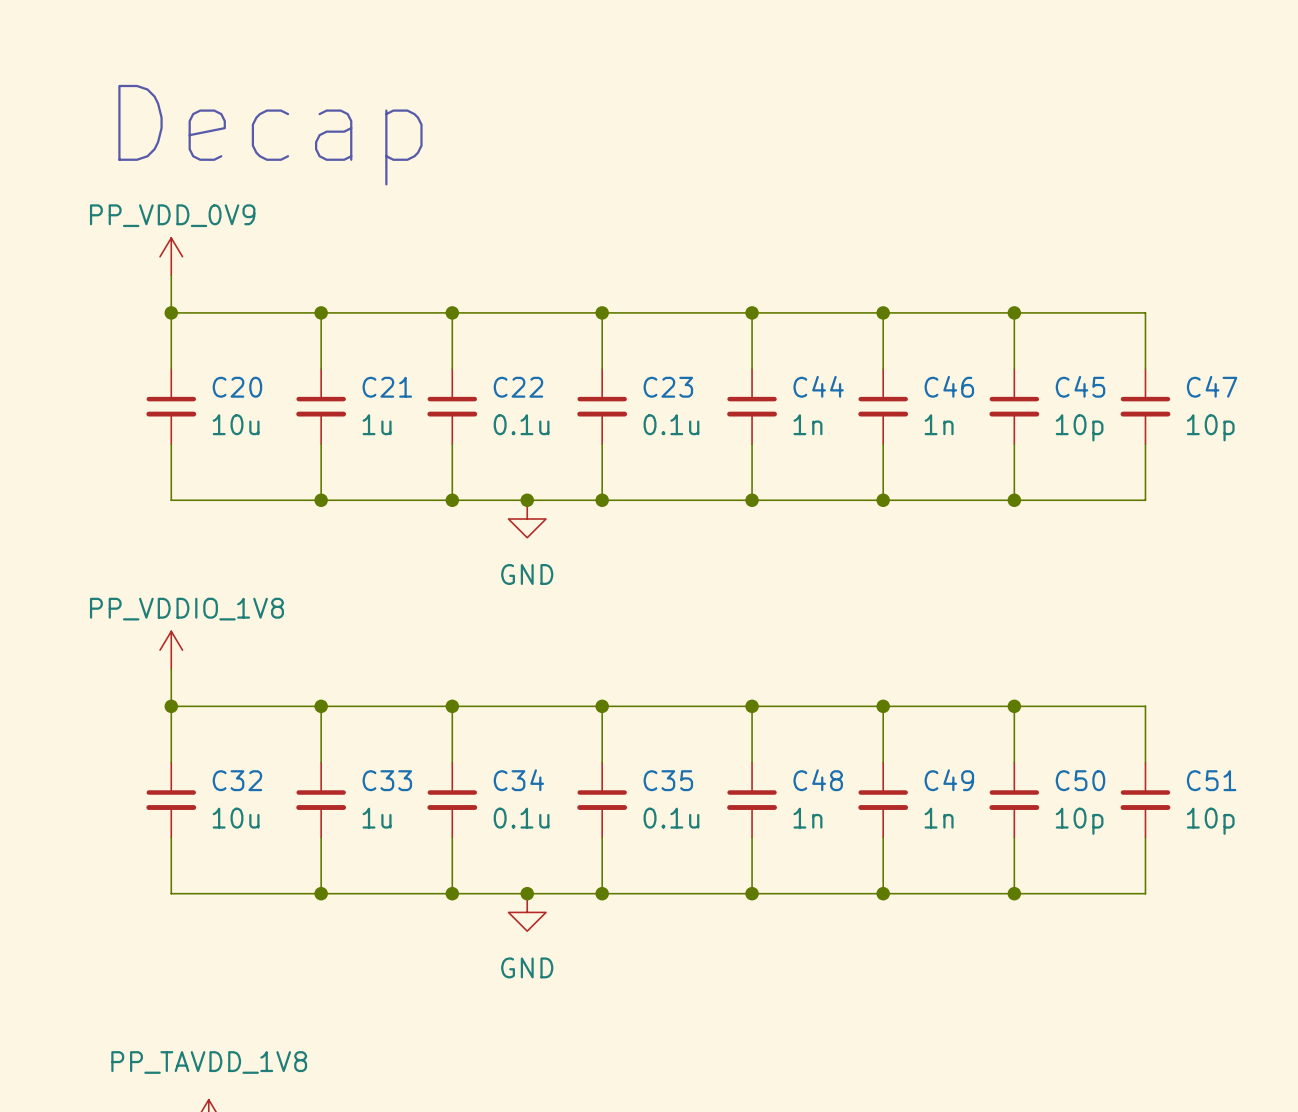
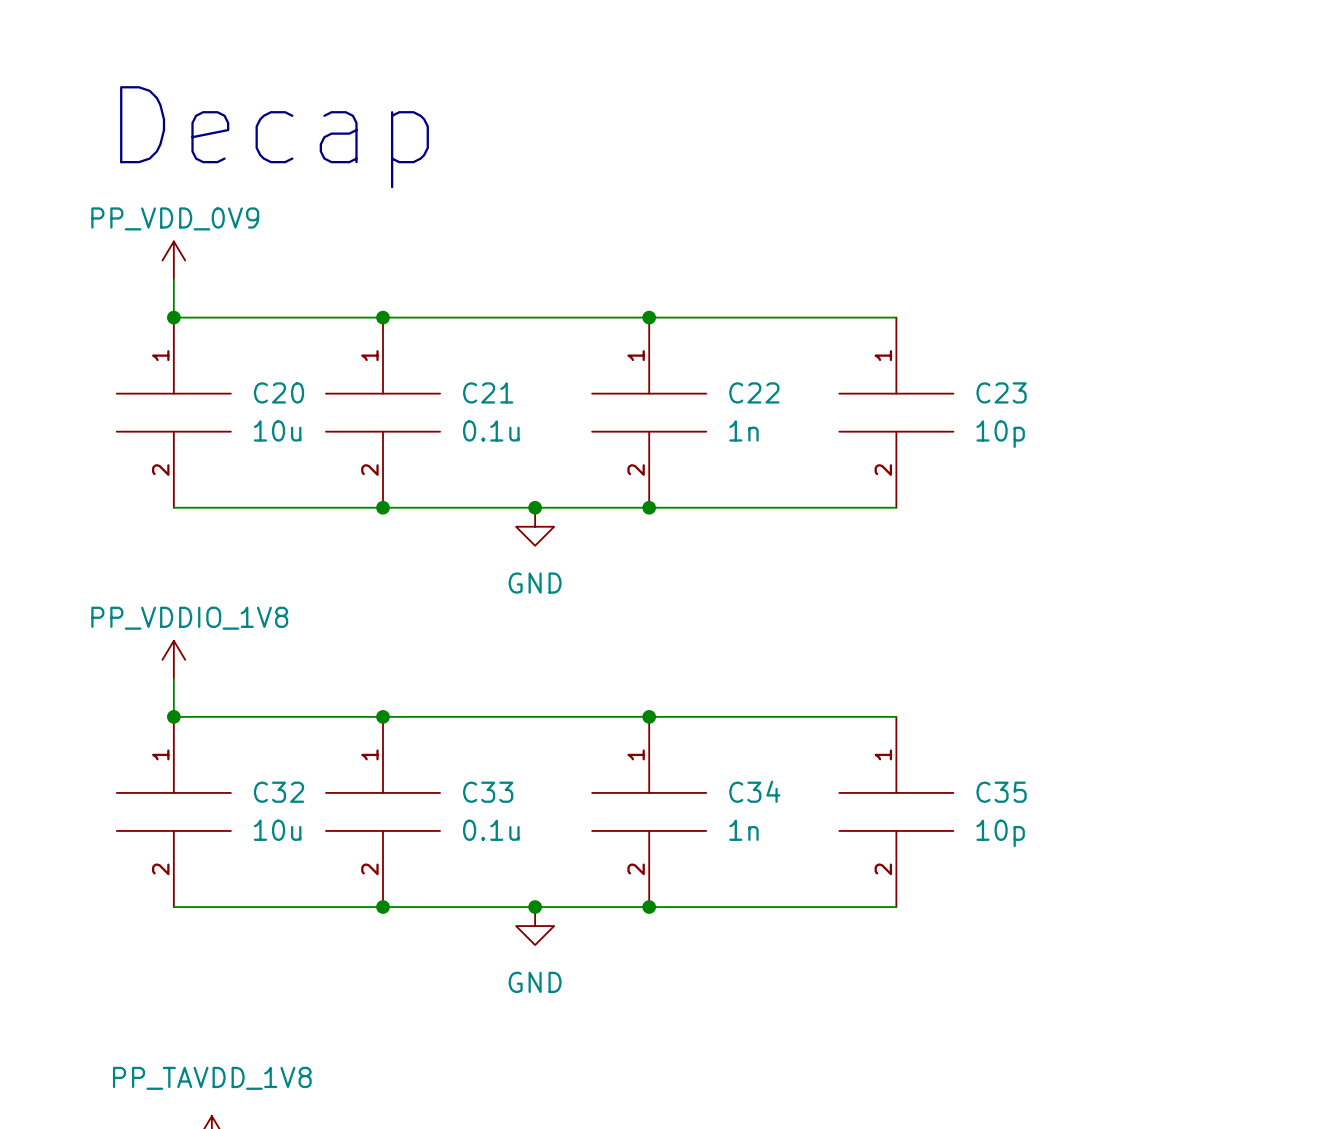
wire: (321, 312) (321, 369) -> none
junction: (321, 312) -> none
junction: none -> (383, 317)
wire: (452, 312) (452, 369) -> none
junction: (452, 312) -> none
wire: (602, 312) (602, 369) -> none
junction position: (602, 312) -> (649, 317)
wire: (752, 312) (752, 369) -> none
junction: (752, 312) -> none
junction: (883, 312) -> none
wire: (1014, 312) (1014, 369) -> none
junction: (1014, 312) -> none
C20 symbol: [146, 369, 197, 445] -> [116, 317, 231, 508]
C21 symbol: [296, 369, 347, 445] -> [325, 317, 441, 508]
C22 symbol: [427, 369, 478, 445] -> [592, 317, 707, 508]
C23 symbol: [577, 369, 628, 445] -> [839, 317, 954, 508]
wire: (883, 369) (883, 312) (1145, 312) (1145, 369) -> none
C20 name position: C20 (237, 387) -> C20 (279, 392)
C21 name position: C21 (387, 387) -> C21 (488, 392)
C22 name position: C22 (518, 387) -> C22 (754, 392)
C23 name position: C23 (668, 387) -> C23 (1001, 392)
C44: 1n (752, 406) -> none
C46: 1n (883, 406) -> none
C45: 10p (1014, 406) -> none
C47: 10p (1145, 406) -> none
C20 value position: 10u (236, 424) -> 10u (277, 430)
C21 value: 1u (377, 424) -> 0.1u (491, 430)
C22 value: 0.1u (521, 424) -> 1n (743, 430)
C23 value: 0.1u (671, 424) -> 10p (1000, 434)
wire: (321, 444) (321, 500) -> none
wire: (452, 444) (452, 500) -> none
wire: (602, 444) (602, 500) -> none
wire: (752, 444) (752, 500) -> none
wire: (883, 444) (883, 500) (1145, 500) (1145, 444) -> none
wire: (1014, 444) (1014, 500) -> none
junction: (321, 500) -> none
junction: none -> (383, 507)
junction: (452, 500) -> none
junction position: (602, 500) -> (649, 507)
junction: (752, 500) -> none
junction: (883, 500) -> none
junction: (1014, 500) -> none
wire: (321, 706) (321, 762) -> none
junction: (321, 706) -> none
junction: none -> (383, 716)
wire: (452, 706) (452, 762) -> none
junction: (452, 706) -> none
wire: (602, 706) (602, 762) -> none
junction position: (602, 706) -> (649, 716)
wire: (752, 706) (752, 762) -> none
junction: (752, 706) -> none
junction: (883, 706) -> none
wire: (1014, 706) (1014, 762) -> none
junction: (1014, 706) -> none
C32 symbol: [146, 762, 197, 838] -> [116, 716, 231, 908]
C33 symbol: [296, 762, 347, 838] -> [325, 716, 441, 908]
C34 symbol: [427, 762, 478, 838] -> [592, 716, 707, 908]
C35 symbol: [577, 762, 628, 838] -> [839, 716, 954, 908]
wire: (883, 762) (883, 706) (1145, 706) (1145, 762) -> none
C32 name position: C32 (237, 780) -> C32 (279, 792)
C33 name position: C33 (387, 780) -> C33 (488, 792)
C34 name position: C34 (518, 780) -> C34 (754, 791)
C35 name position: C35 (668, 780) -> C35 (1001, 792)
C48: 1n (752, 800) -> none
C49: 1n (883, 800) -> none
C50: 10p (1014, 800) -> none
C51: 10p (1145, 800) -> none
C32 value position: 10u (236, 818) -> 10u (277, 830)
C33 value: 1u (377, 818) -> 0.1u (491, 830)
C34 value: 0.1u (521, 818) -> 1n (743, 830)
C35 value: 0.1u (671, 818) -> 10p (1000, 833)
wire: (321, 837) (321, 893) -> none
wire: (452, 837) (452, 893) -> none
wire: (602, 837) (602, 893) -> none
wire: (752, 837) (752, 893) -> none
wire: (883, 837) (883, 893) (1145, 893) (1145, 837) -> none
wire: (1014, 837) (1014, 893) -> none
junction: (321, 893) -> none
junction: none -> (383, 907)
junction: (452, 893) -> none
junction position: (602, 893) -> (649, 907)
junction: (752, 893) -> none
junction: (883, 893) -> none
junction: (1014, 893) -> none

